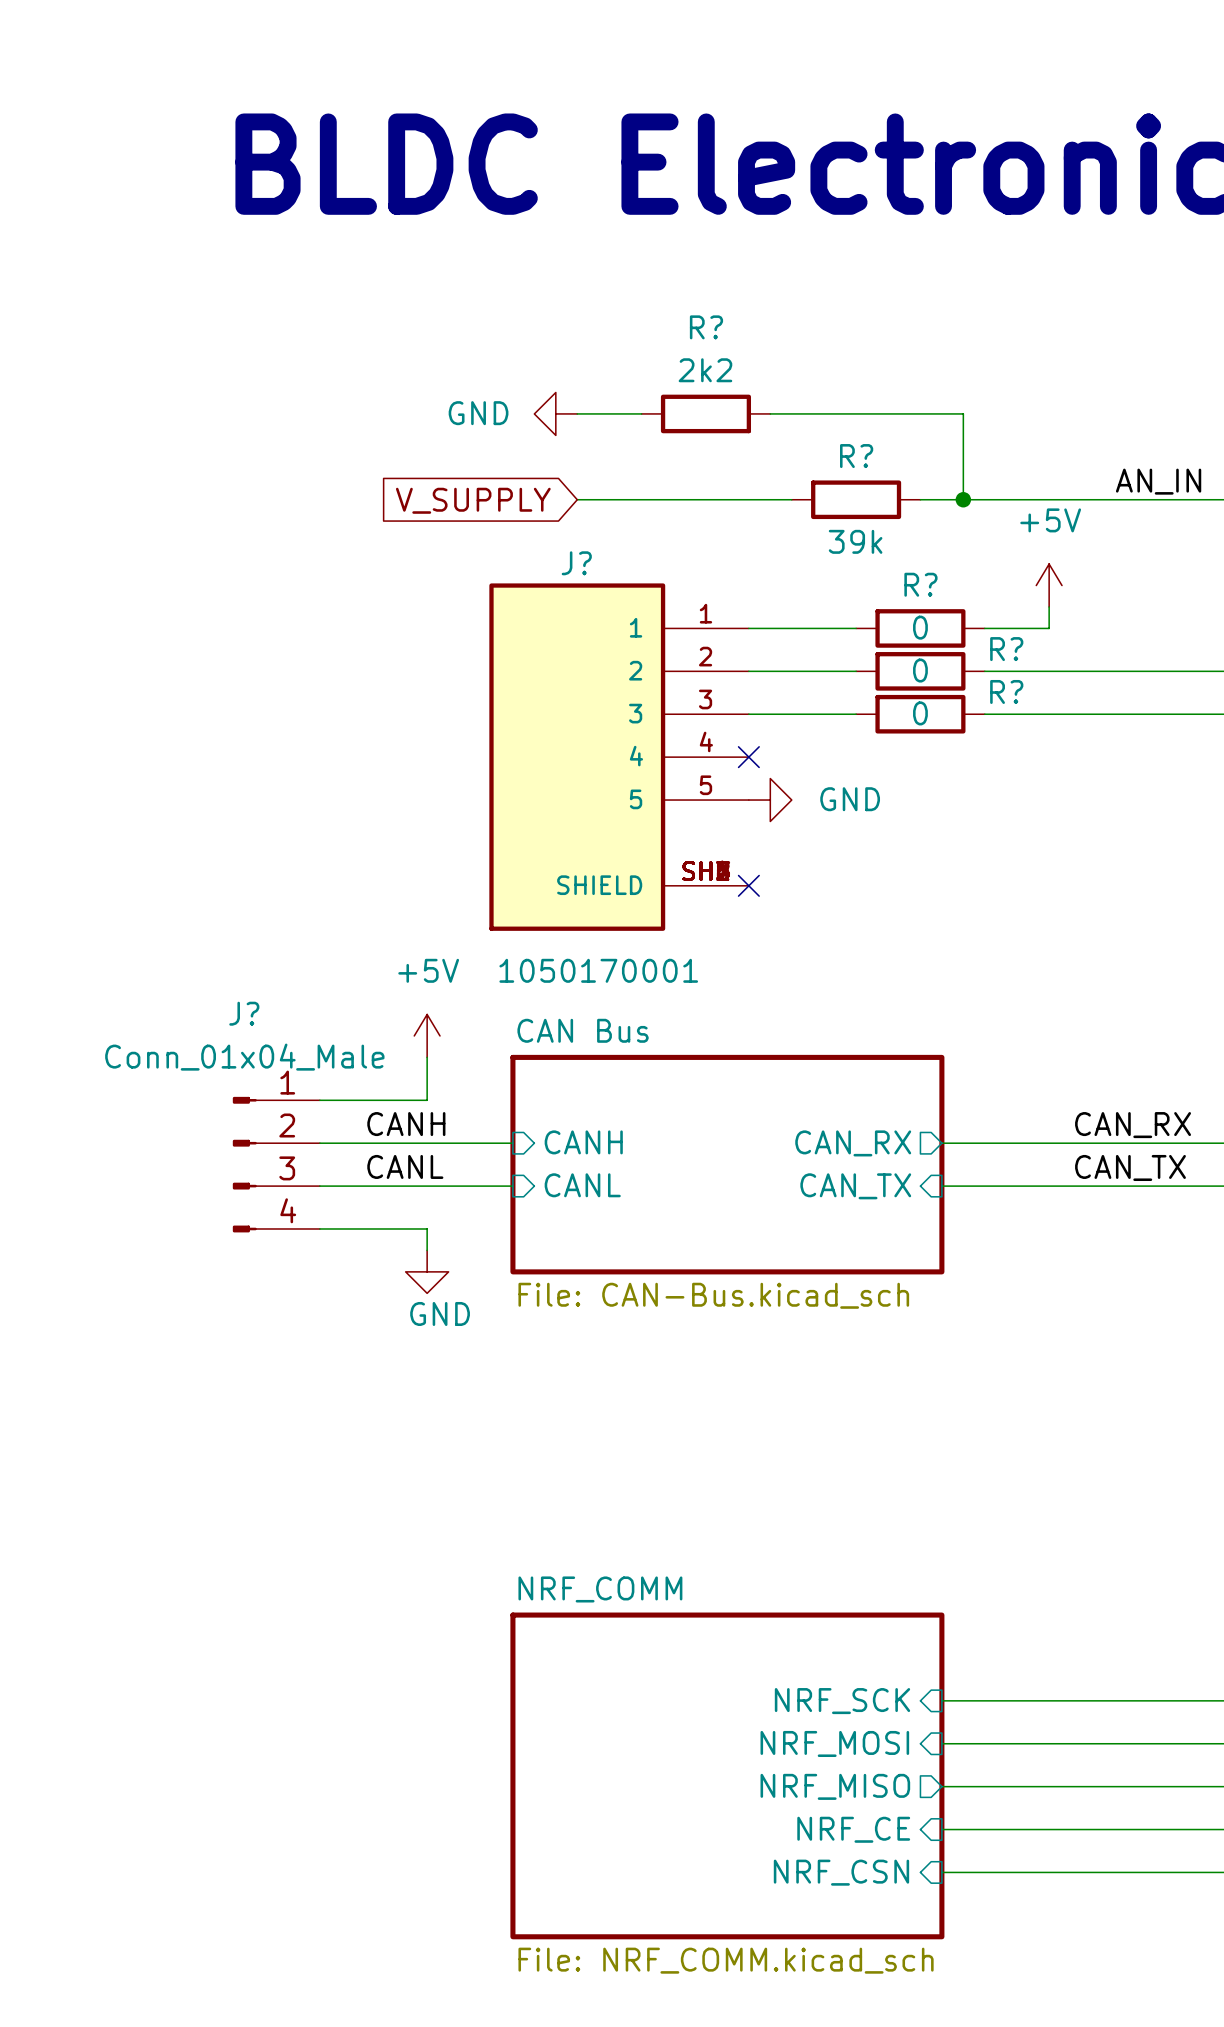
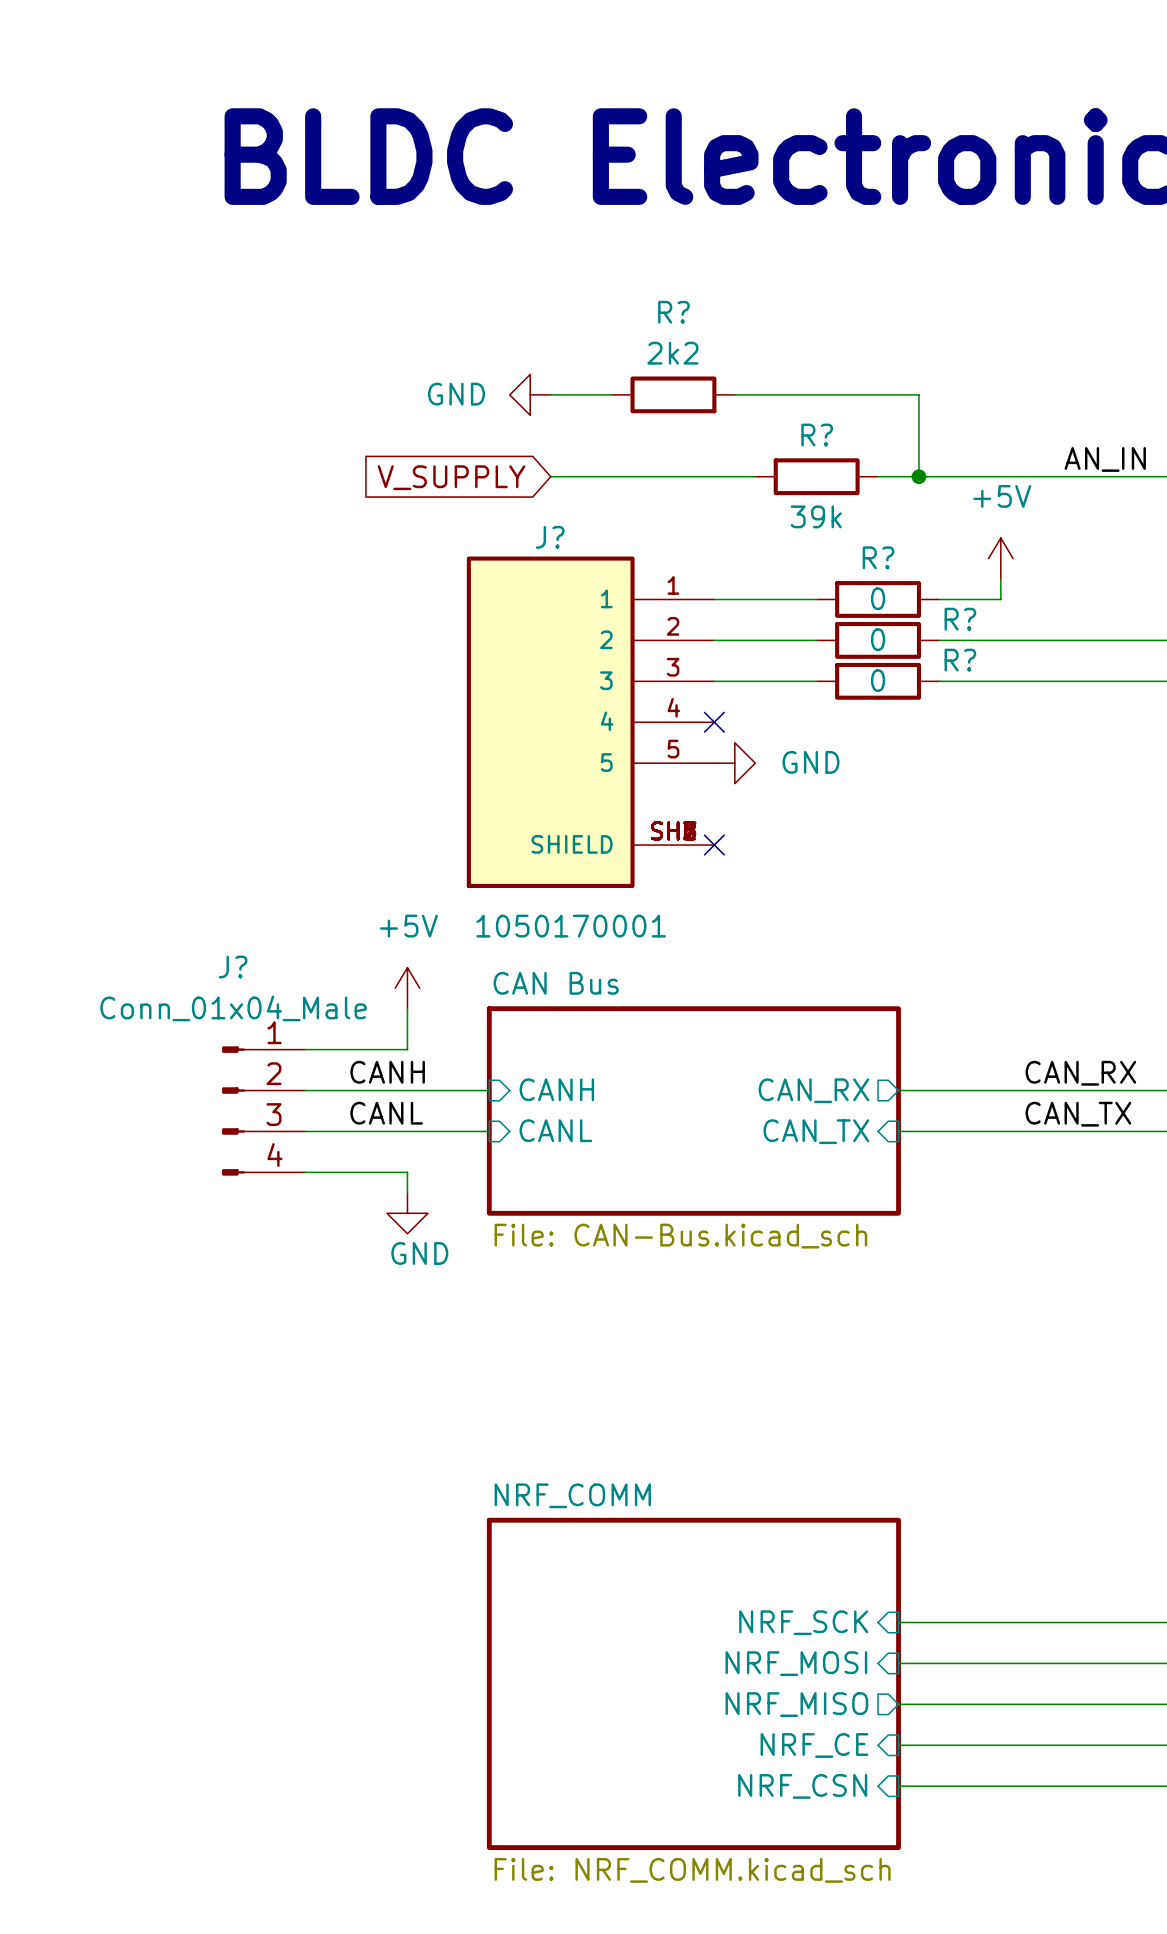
sheet NRF_COMM shape: [510, 1612, 945, 1940] -> [486, 1517, 901, 1851]

